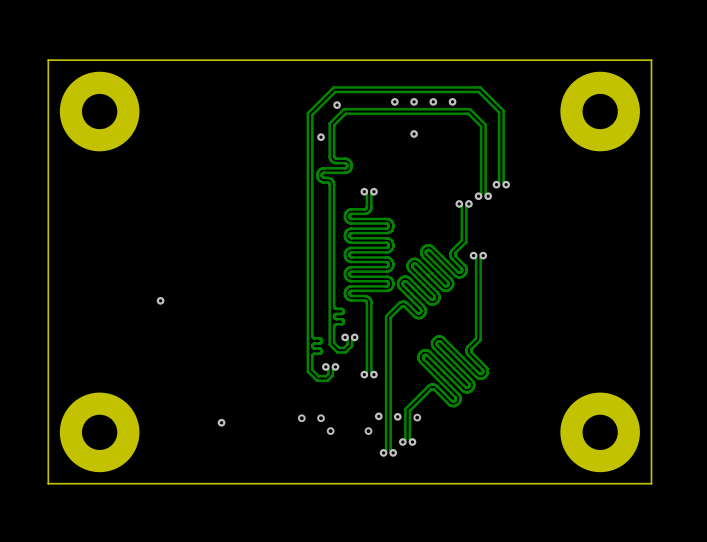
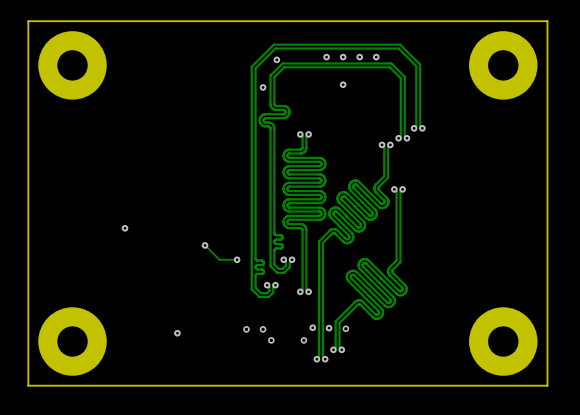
track: none -> (205, 245) (219, 259) (237, 259)
via: none -> (205, 245)
via: none -> (237, 259)

